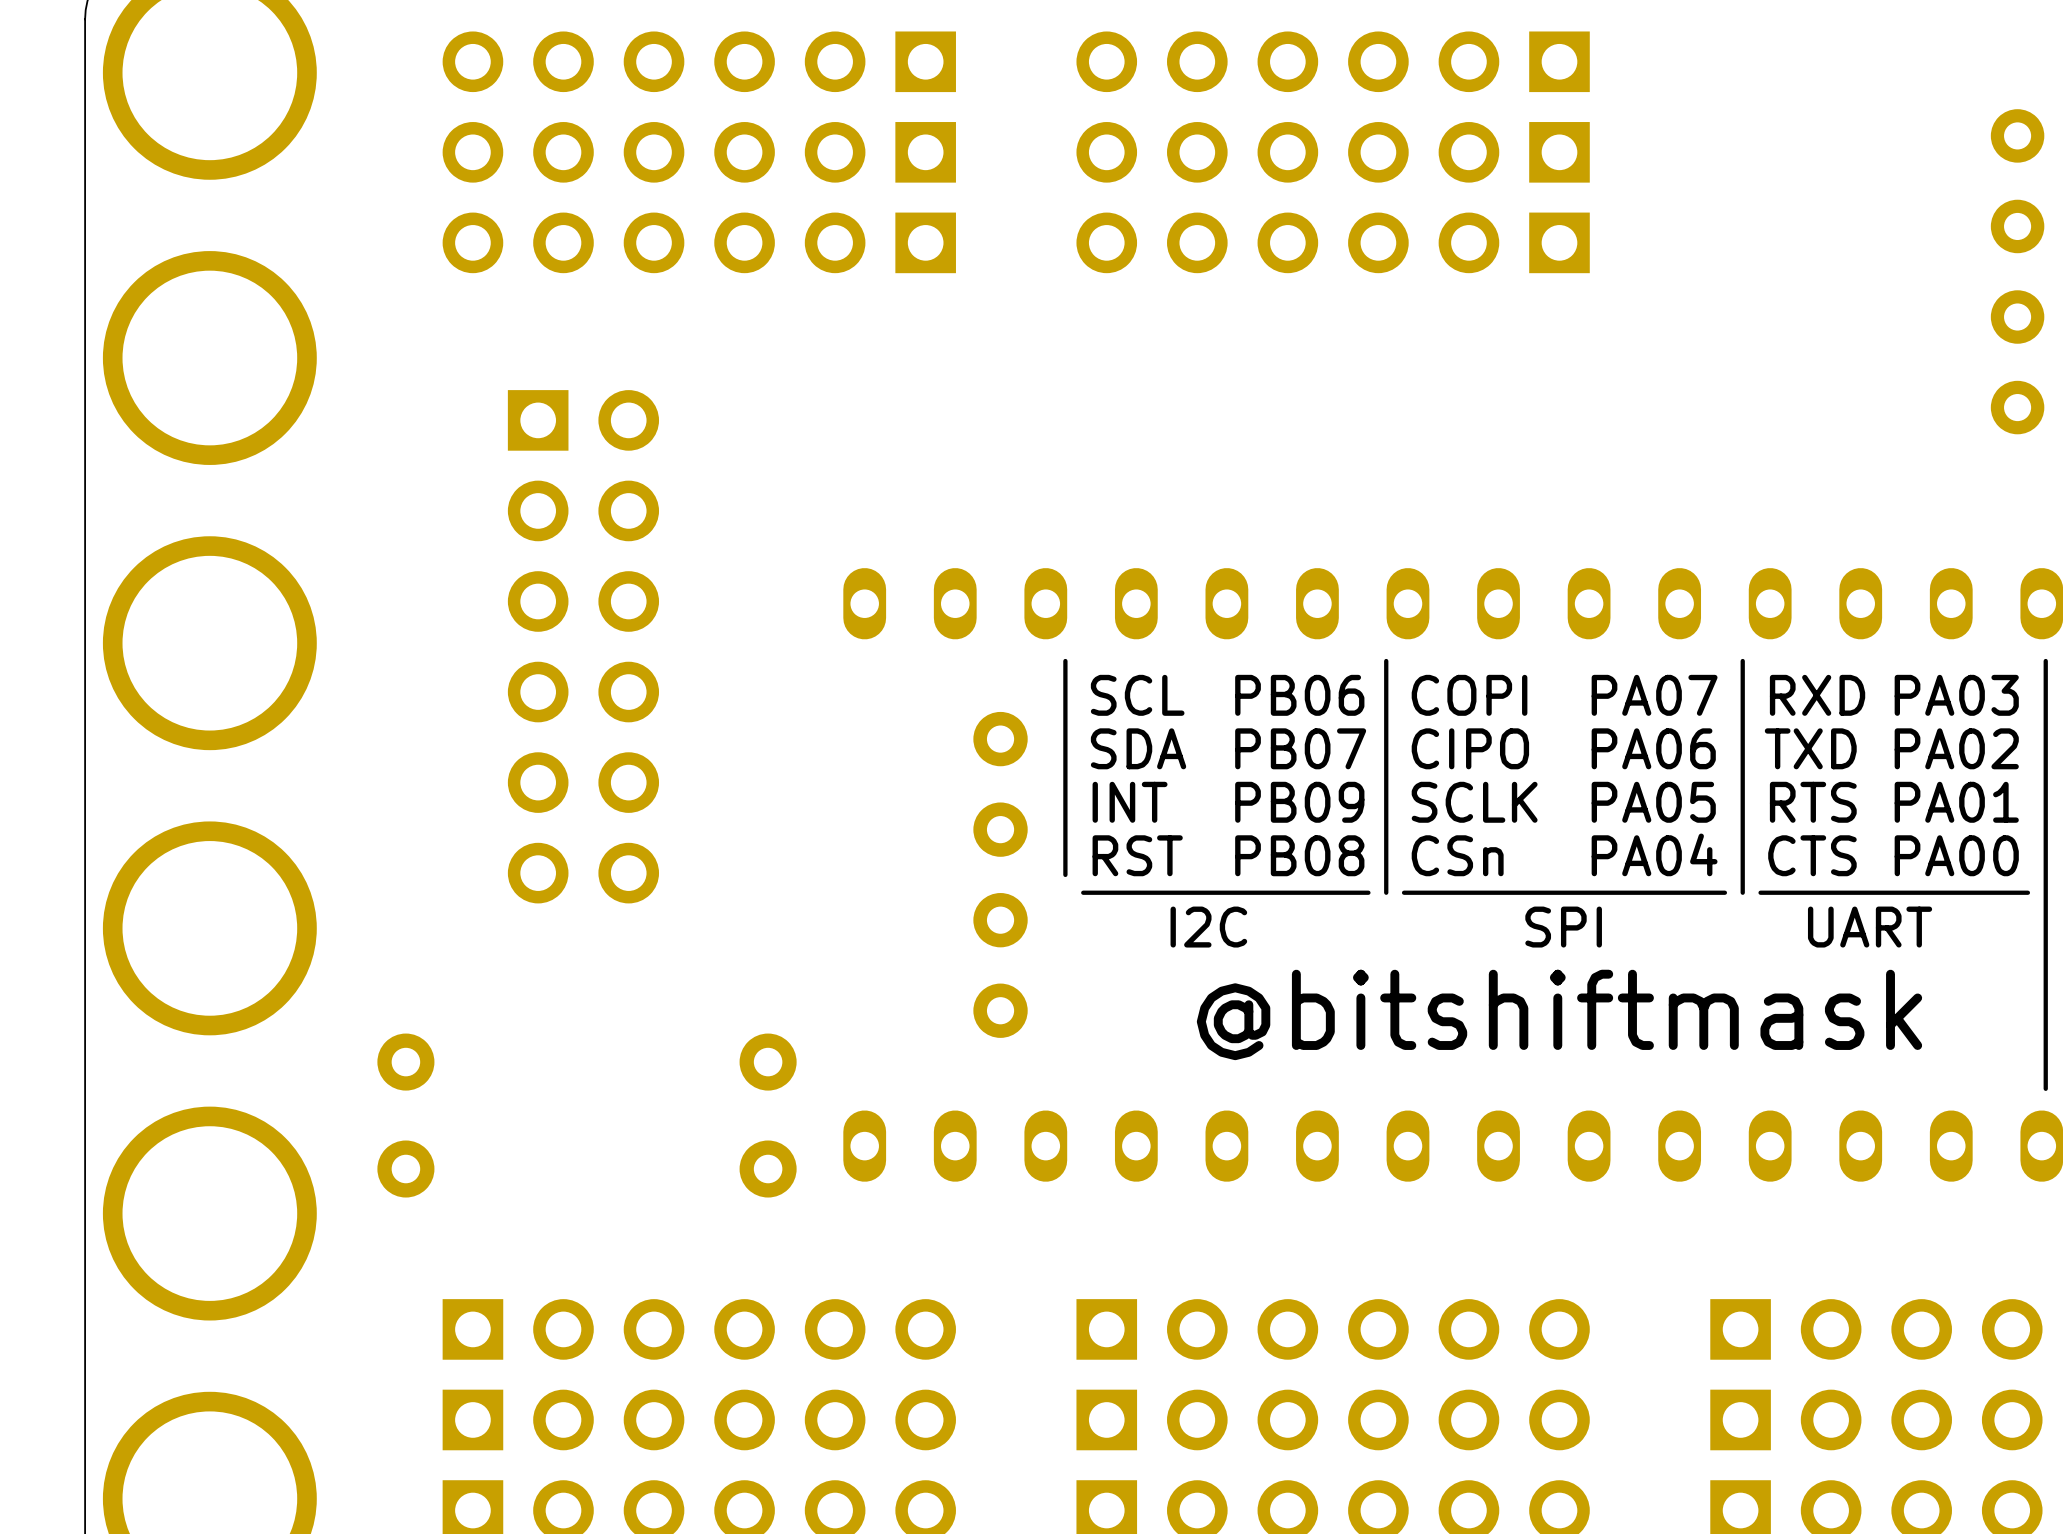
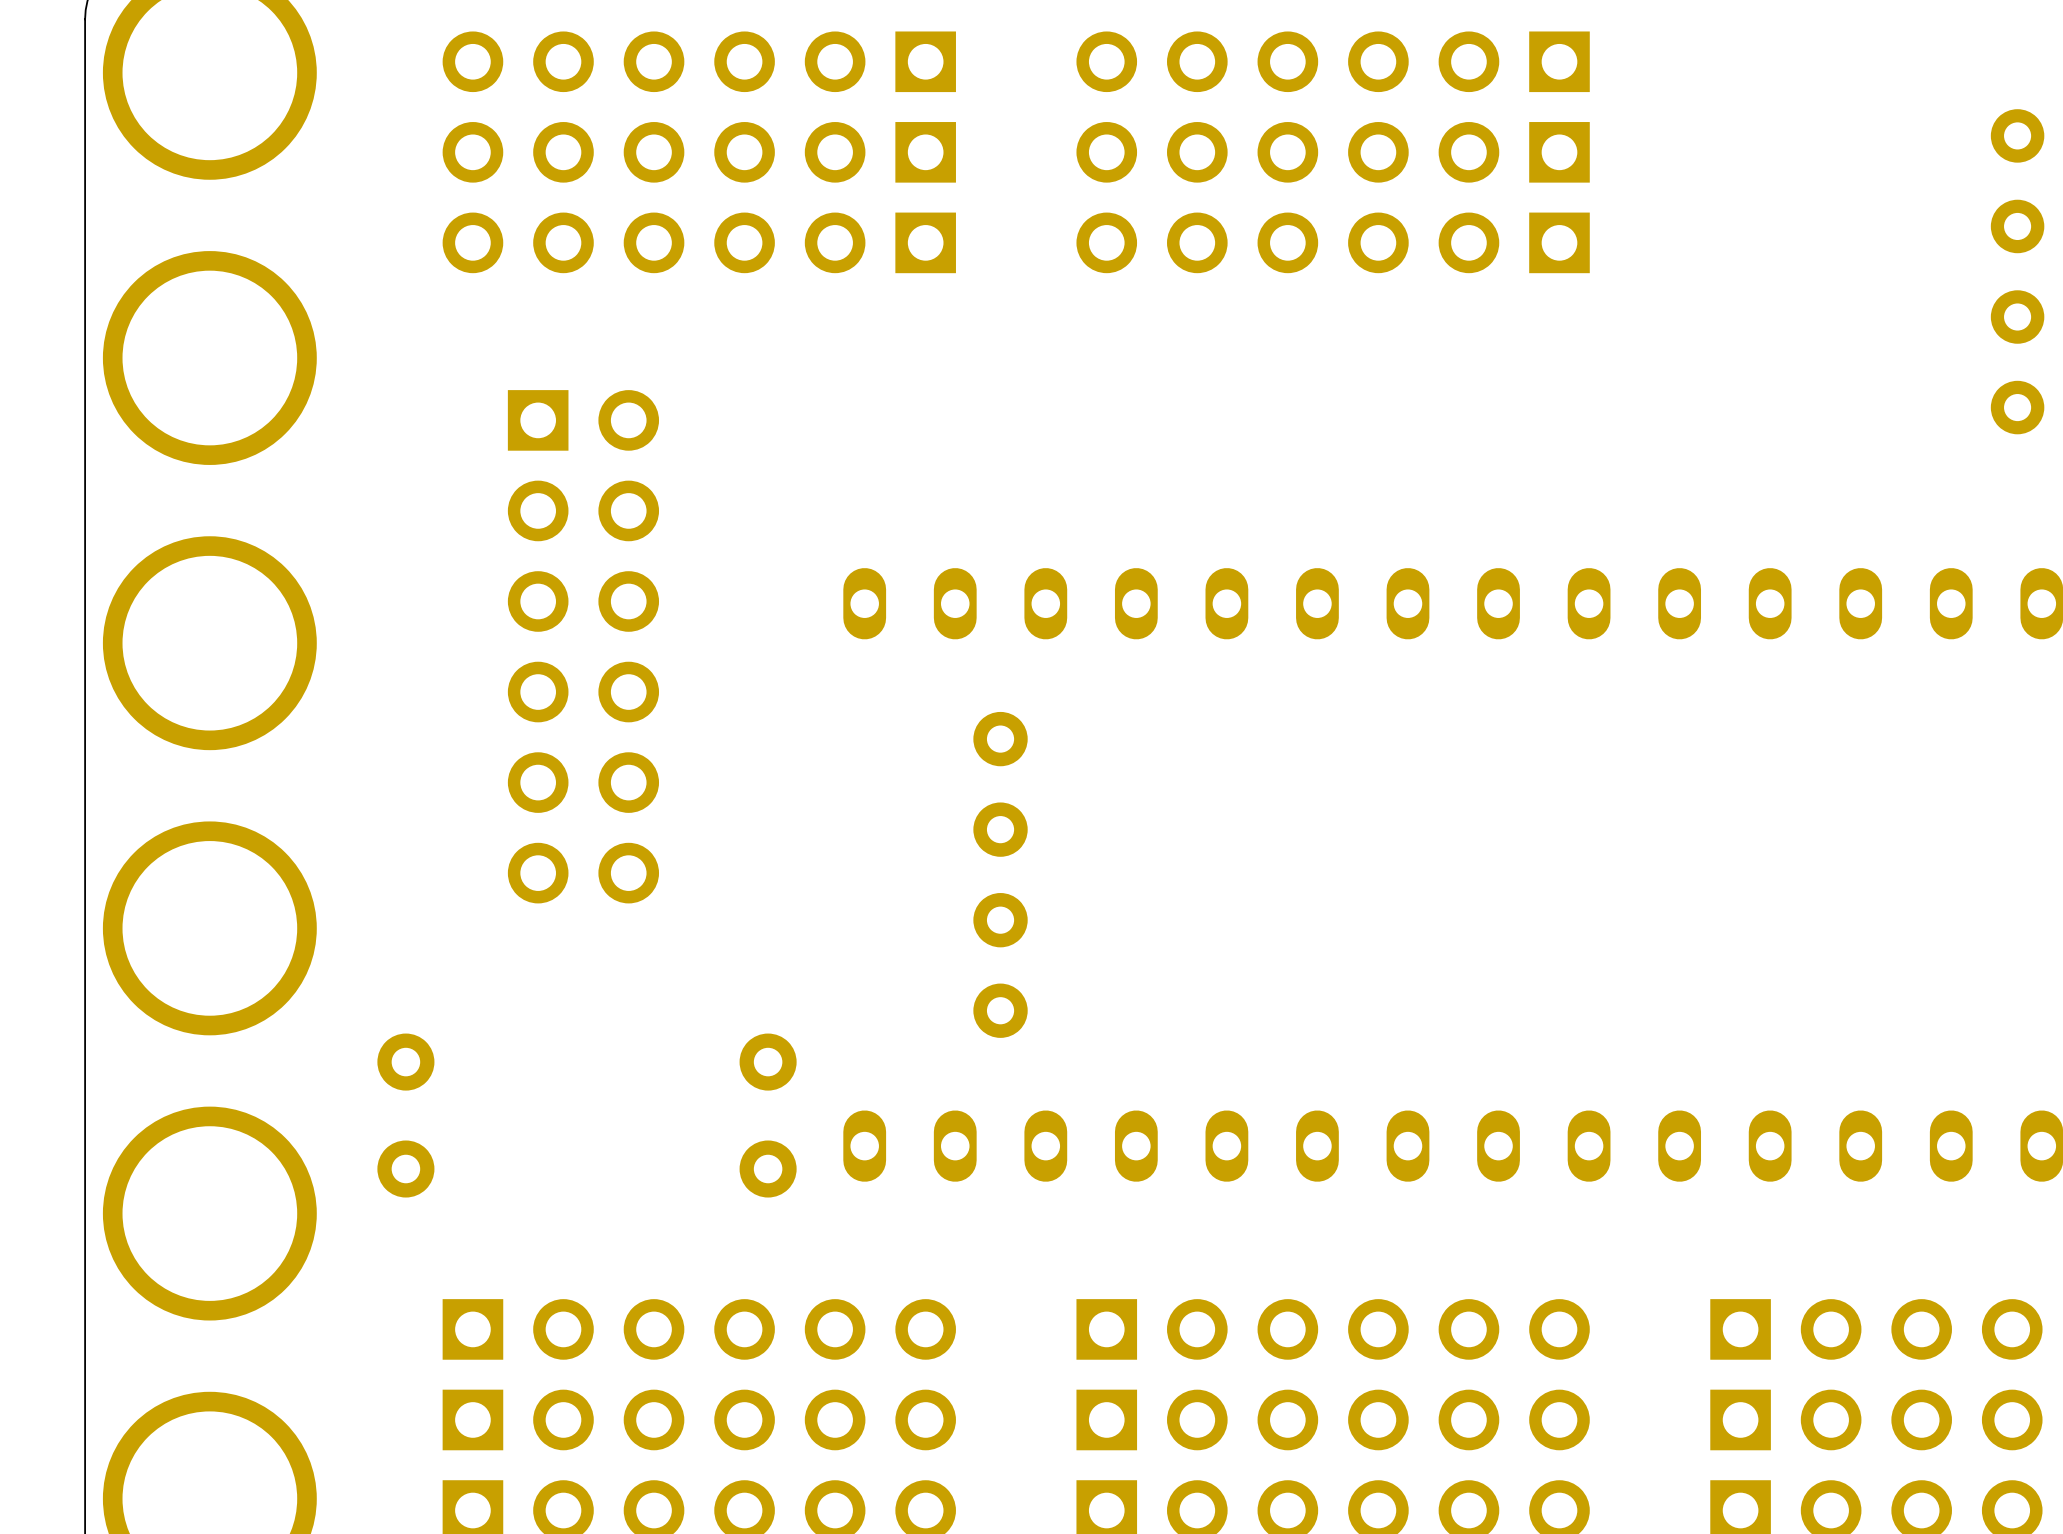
line: (1065, 661) (1065, 874) -> none
line: (1386, 661) (1386, 892) -> none
line: (1742, 661) (1742, 892) -> none
line: (2045, 661) (2045, 1088) -> none
text: SCL (1137, 695) -> none
text: PB06 (1299, 695) -> none
text: COPI (1469, 695) -> none
text: PA07 (1654, 695) -> none
text: RXD (1817, 695) -> none
text: PA03 (1956, 695) -> none
text: SDA (1138, 748) -> none
text: PB07 (1300, 748) -> none
text: CIPO (1470, 748) -> none
text: PA06 (1653, 748) -> none
text: TXD (1810, 748) -> none
text: PA02 (1956, 748) -> none
text: INT (1130, 802) -> none
text: PB09 (1299, 802) -> none
text: SCLK (1474, 802) -> none
text: PA05 (1653, 802) -> none
text: RTS (1813, 802) -> none
text: PA01 (1956, 802) -> none
text: PA04 (1654, 854) -> none
text: RST (1137, 855) -> none
text: PB08 (1299, 855) -> none
text: CSn (1457, 855) -> none
text: CTS (1812, 855) -> none
text: PA00 (1956, 855) -> none
line: (1368, 892) (1083, 892) -> none
line: (1724, 892) (1404, 892) -> none
line: (2027, 892) (1760, 892) -> none
text: I2C (1208, 927) -> none
text: SPI (1563, 927) -> none
text: UART (1870, 927) -> none
text: @bitshiftmask (1559, 1014) -> none

